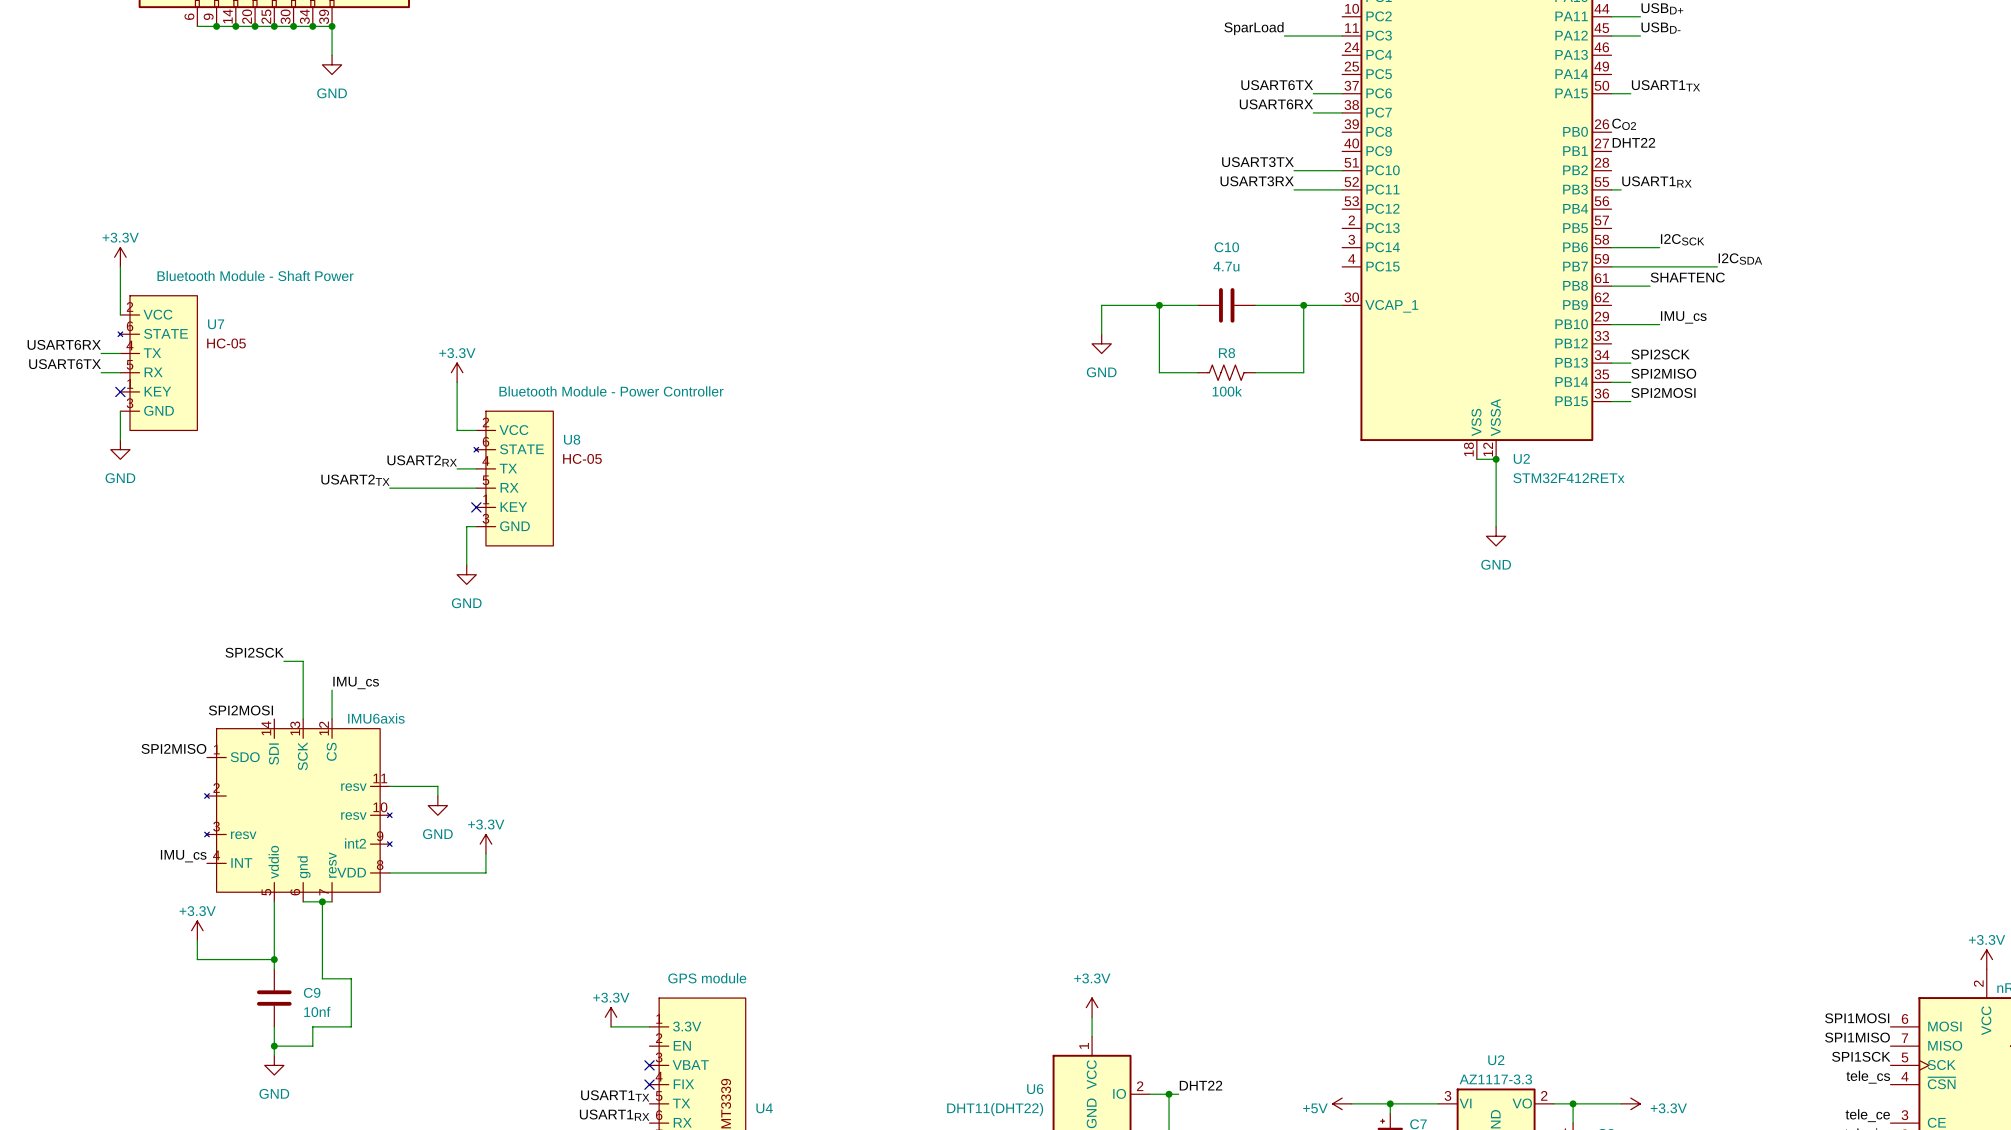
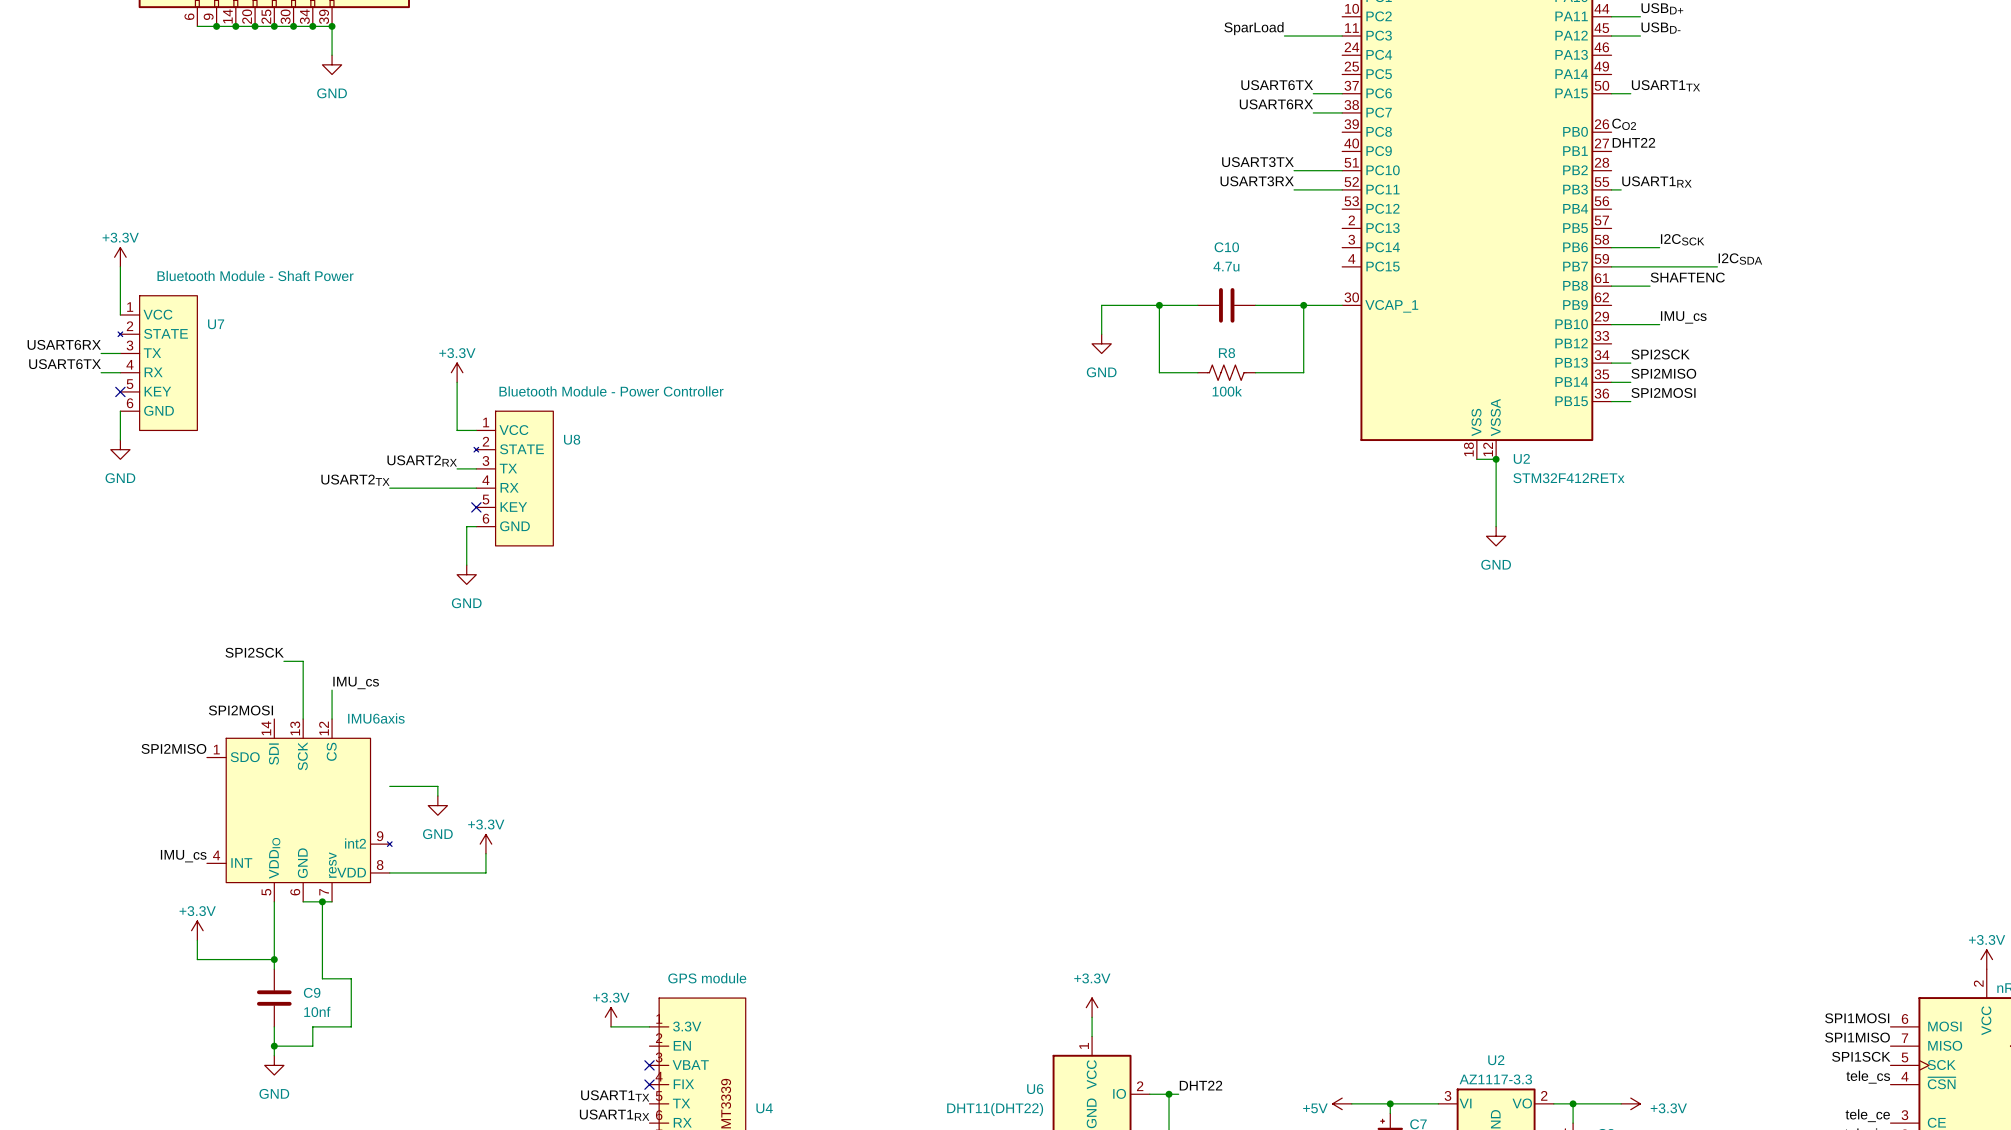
U7 symbol: [118, 295, 198, 431] -> [118, 295, 198, 431]
U8 symbol: [474, 411, 554, 546] -> [474, 411, 554, 546]
IMU6axis symbol: [204, 719, 393, 902] -> [206, 719, 393, 902]

